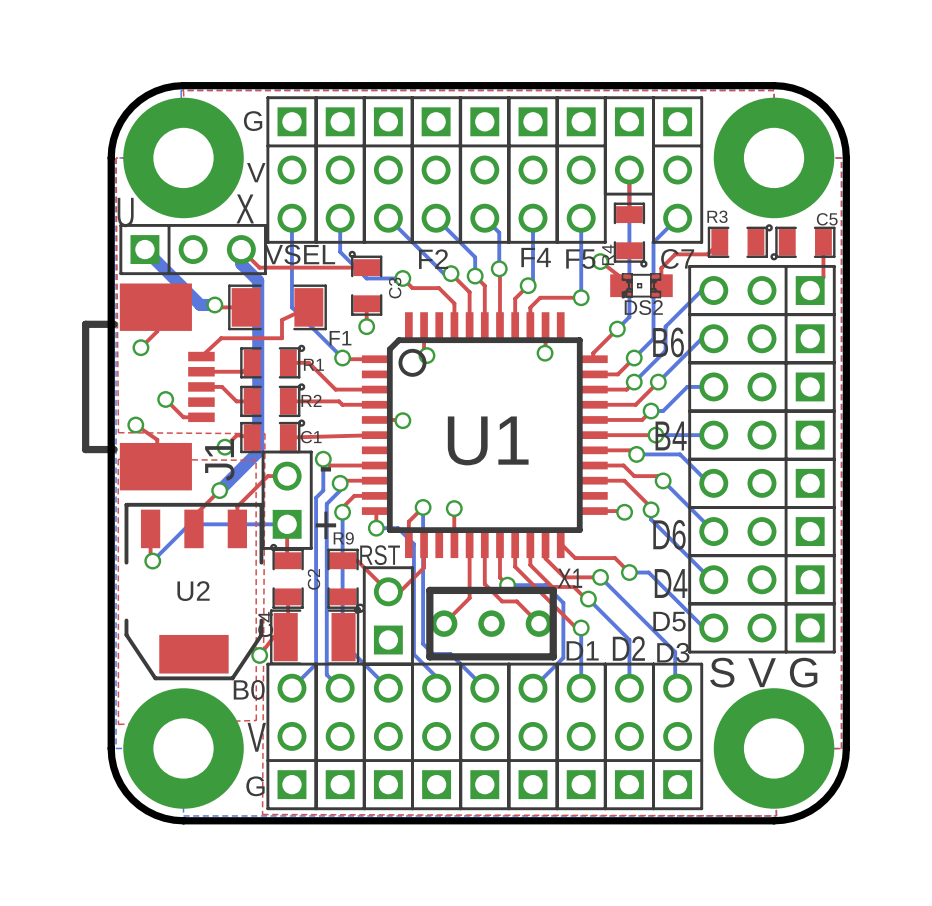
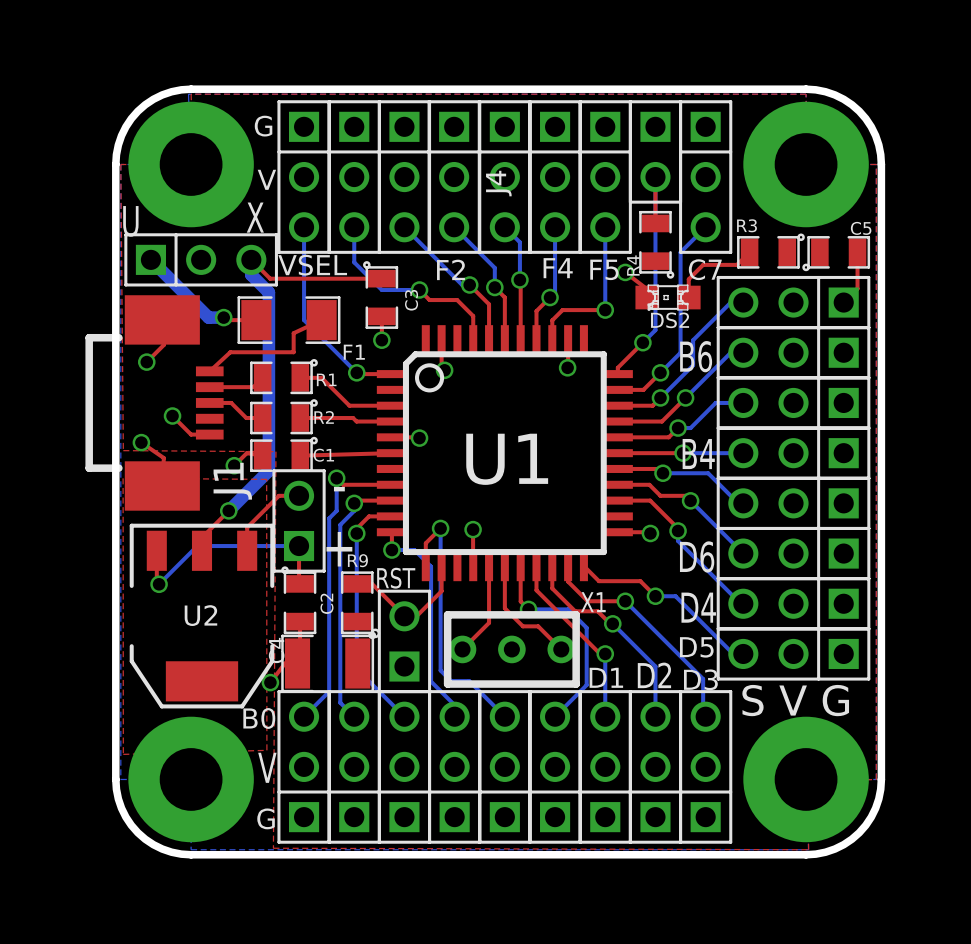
J4 name: none -> J4 (498, 183)

